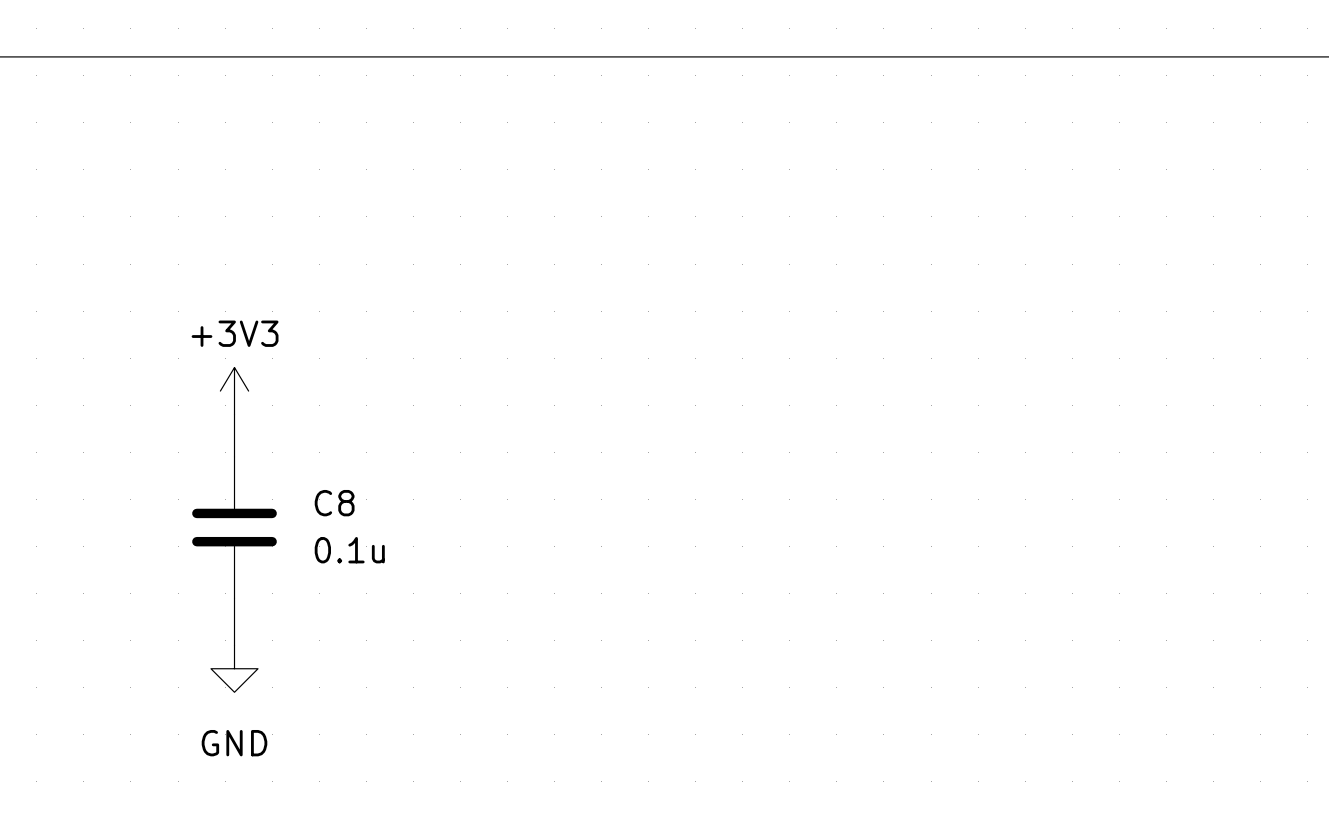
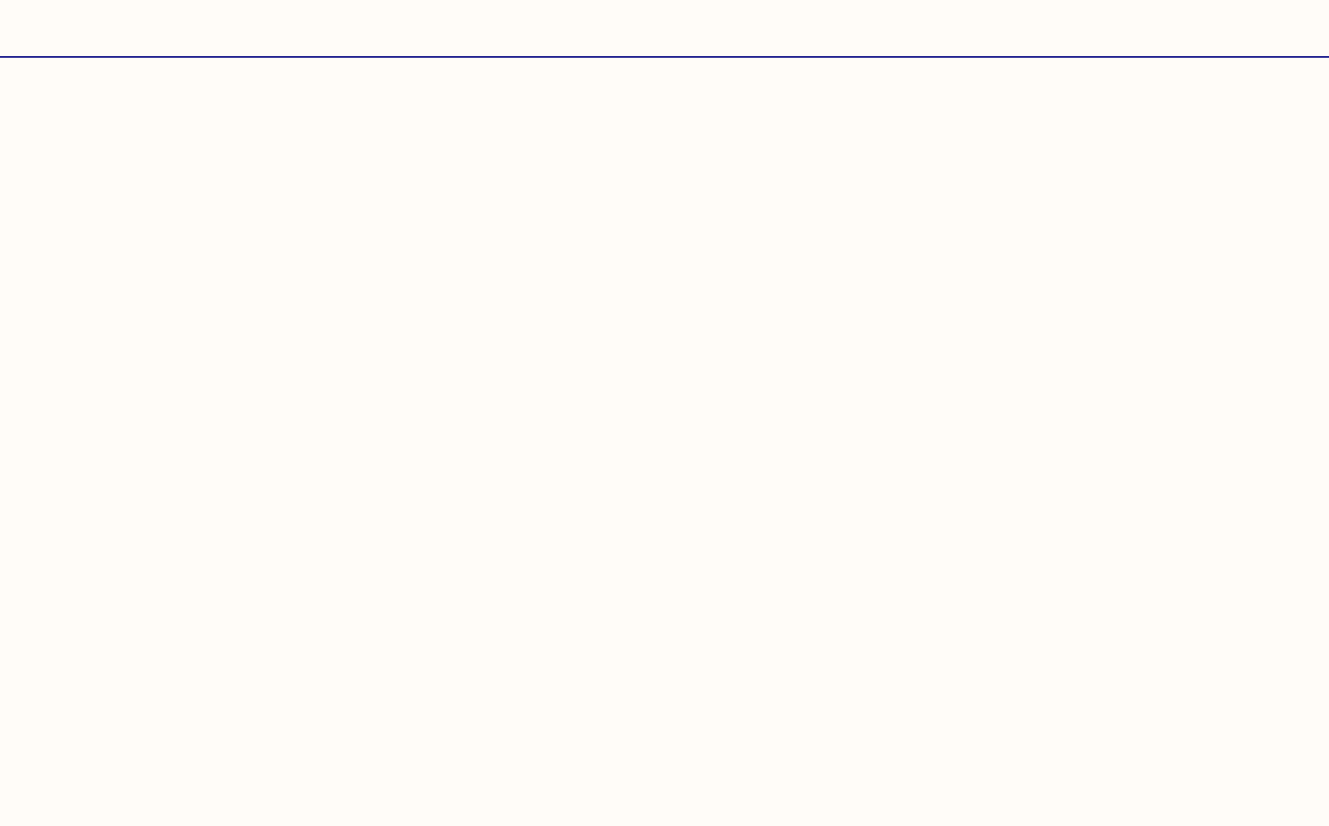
power symbol: +3V3 (234, 391) -> none
wire: (234, 414) (234, 456) -> none
C8: 0.1u (234, 527) -> none
wire: (234, 598) (234, 645) -> none
power symbol: GND (234, 668) -> none

